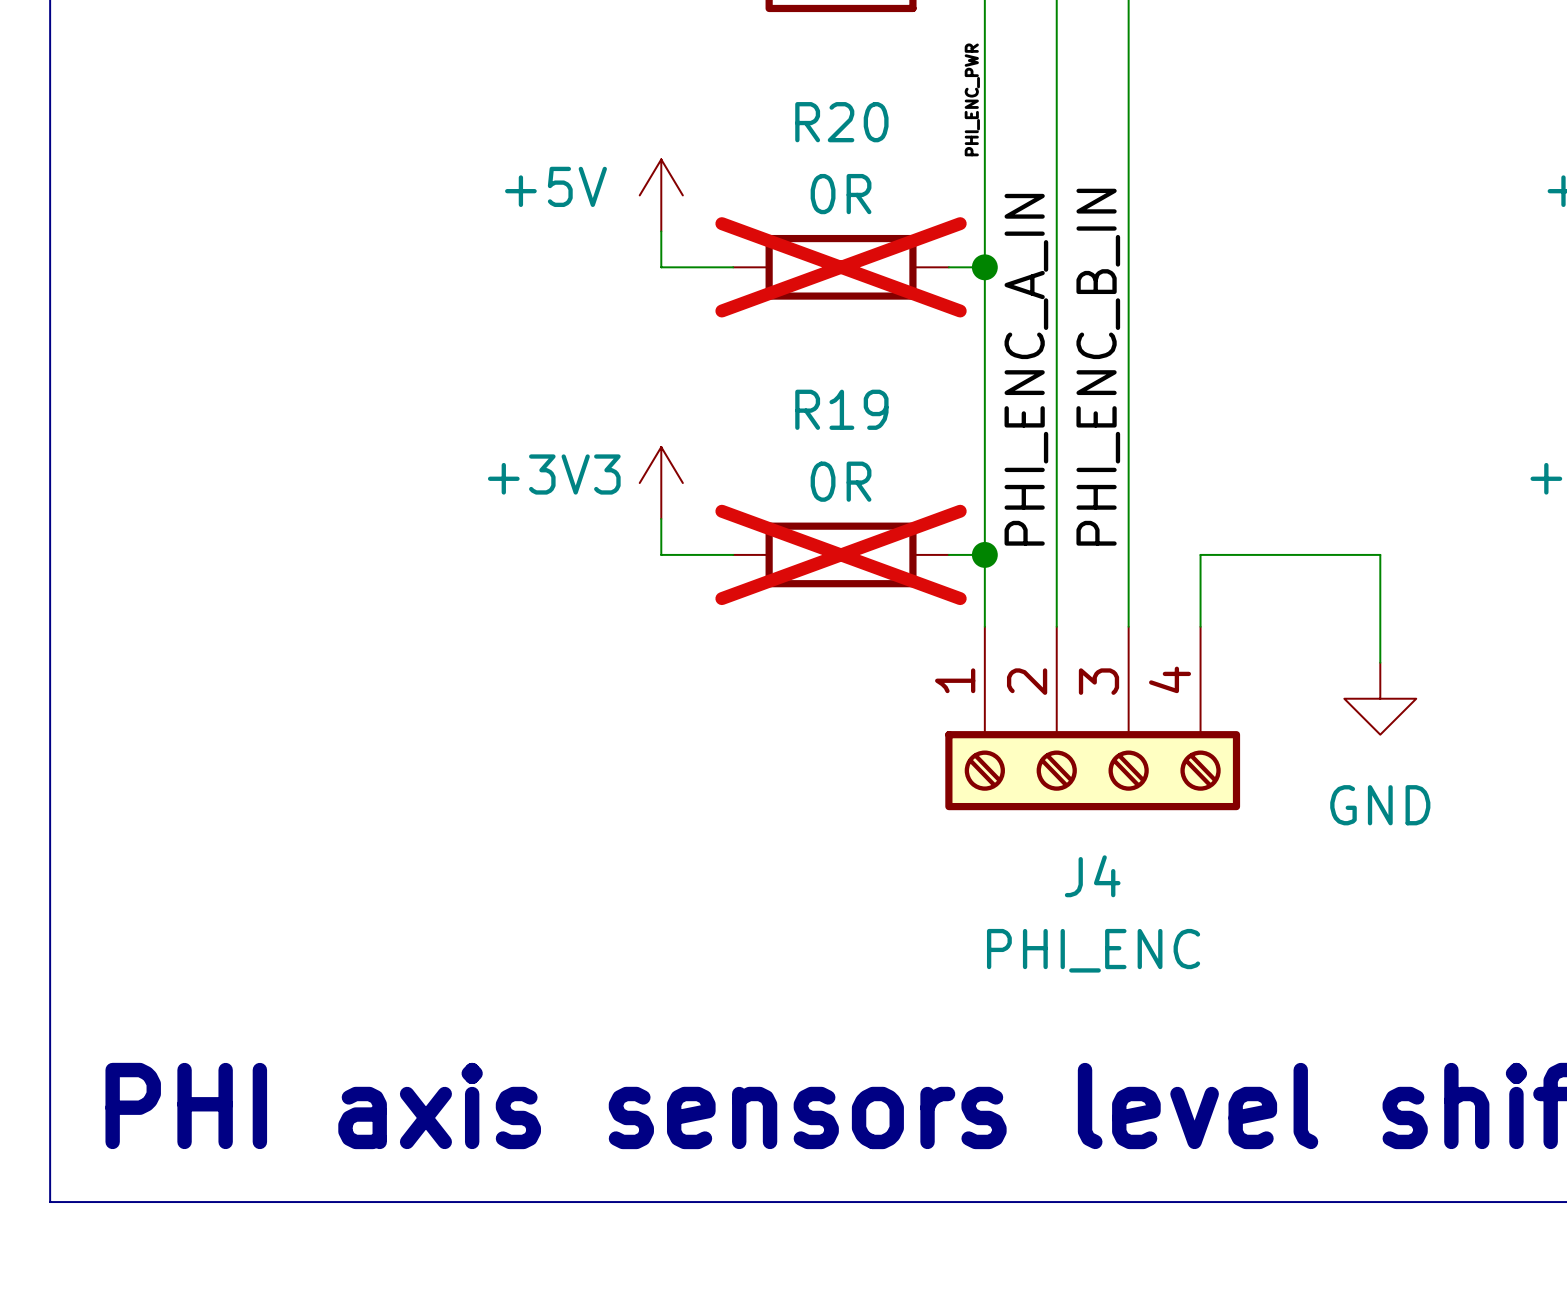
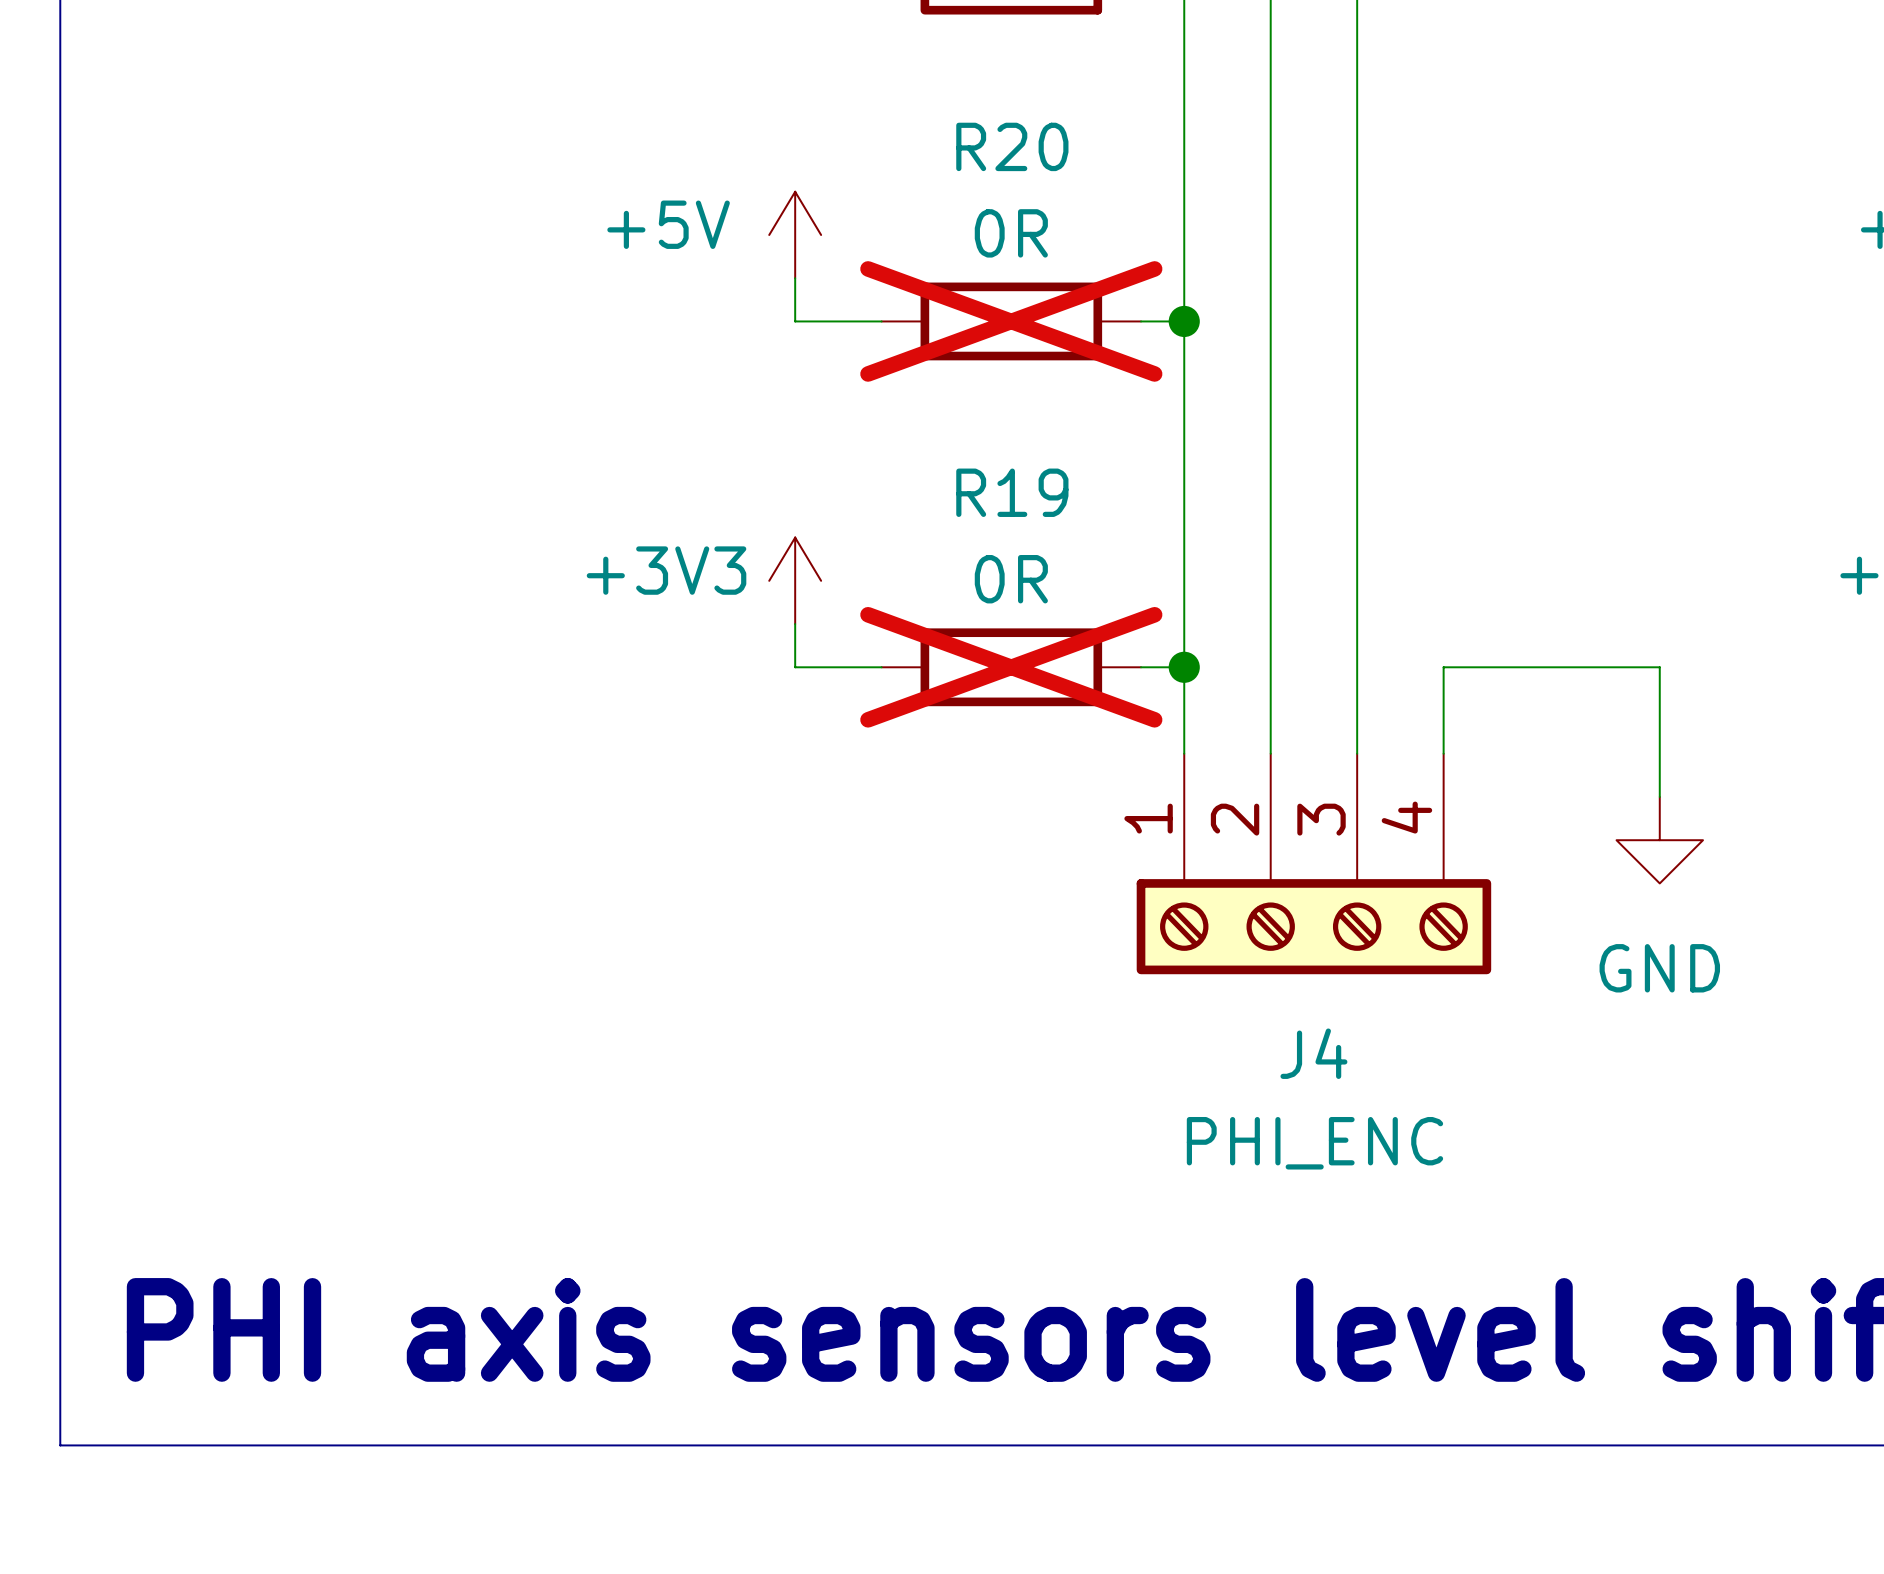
label: PHI_ENC_PWR (972, 99) -> none
label: PHI_ENC_B_IN (1098, 367) -> none
label: PHI_ENC_A_IN (1026, 369) -> none

